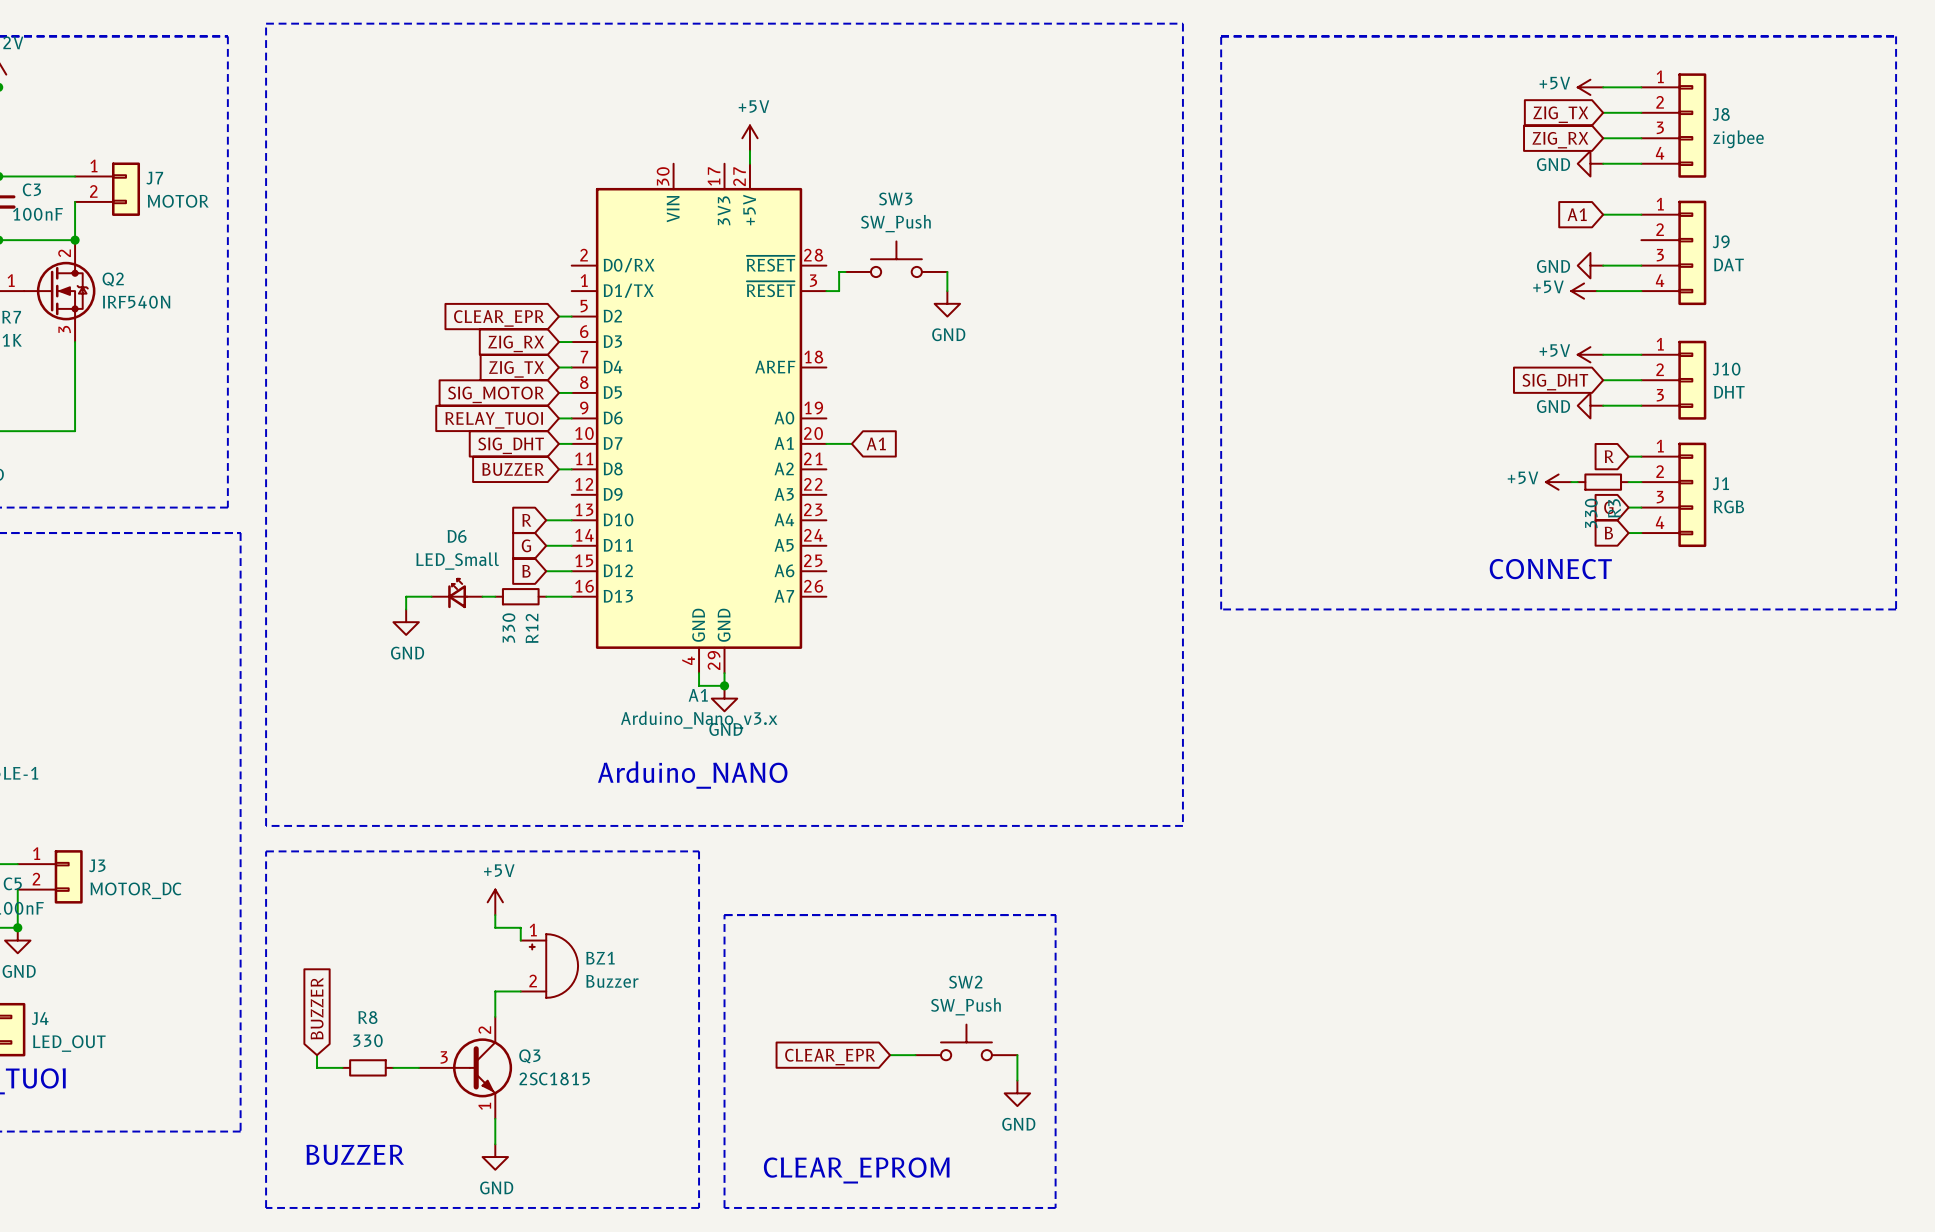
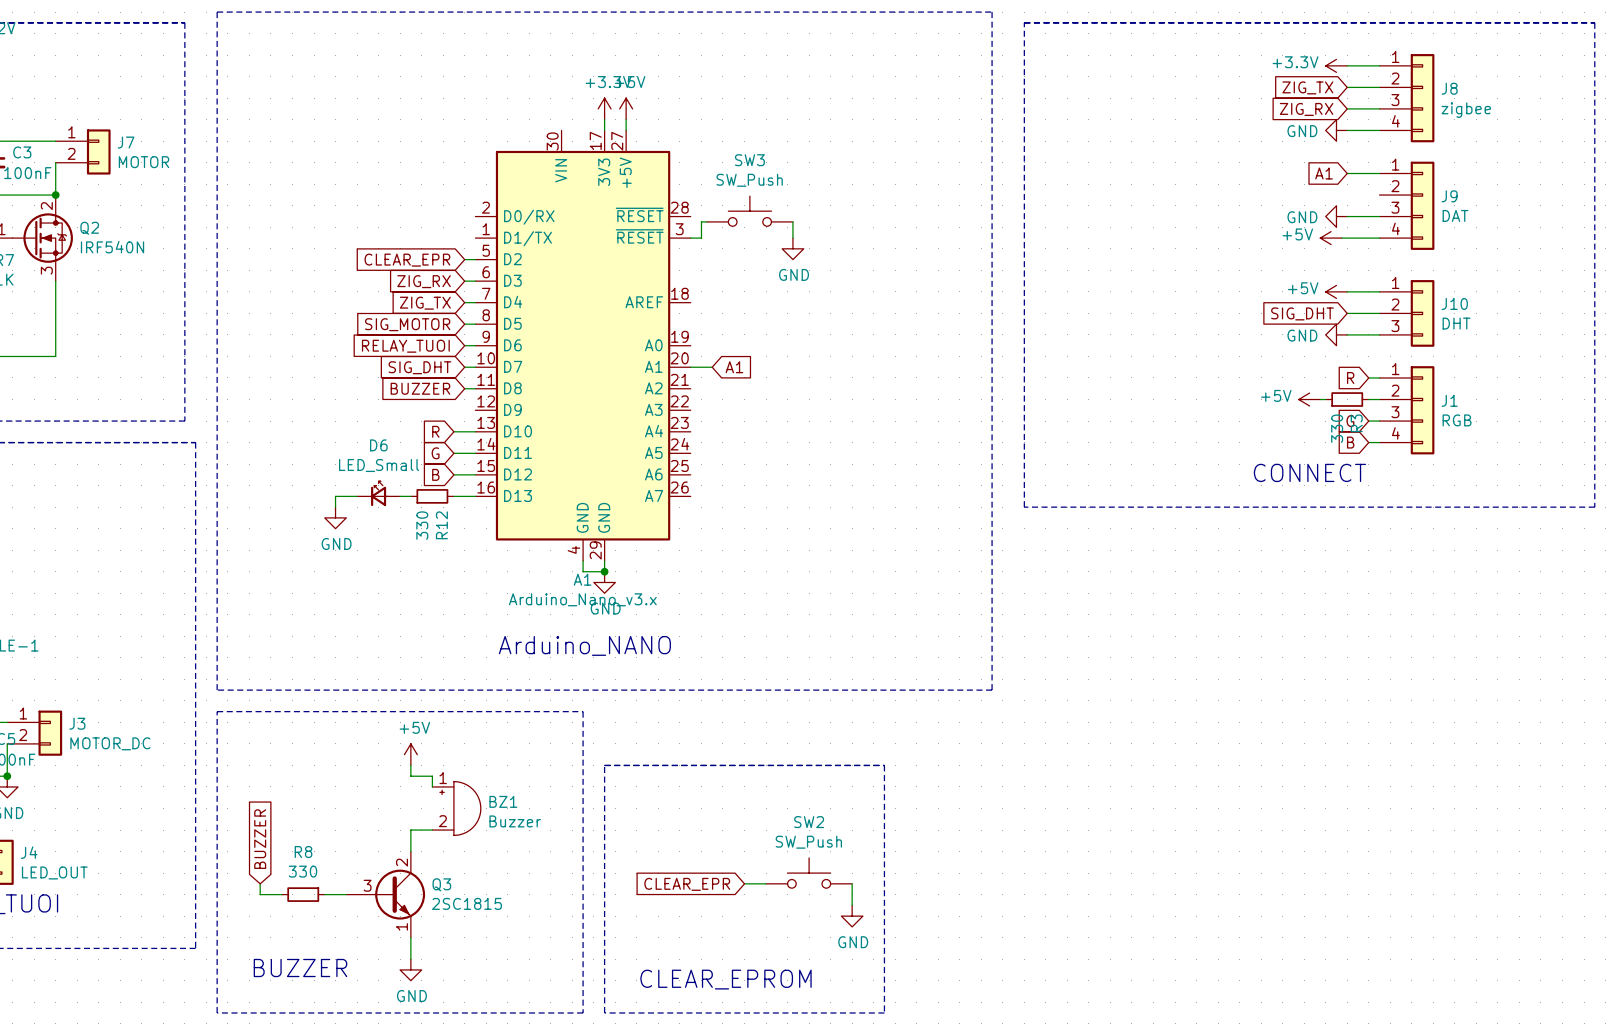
power symbol: +5V (1590, 87) -> +3.3V (1336, 65)
power symbol: none -> +3.3V (604, 108)
wire: none -> (604, 119) (604, 130)

